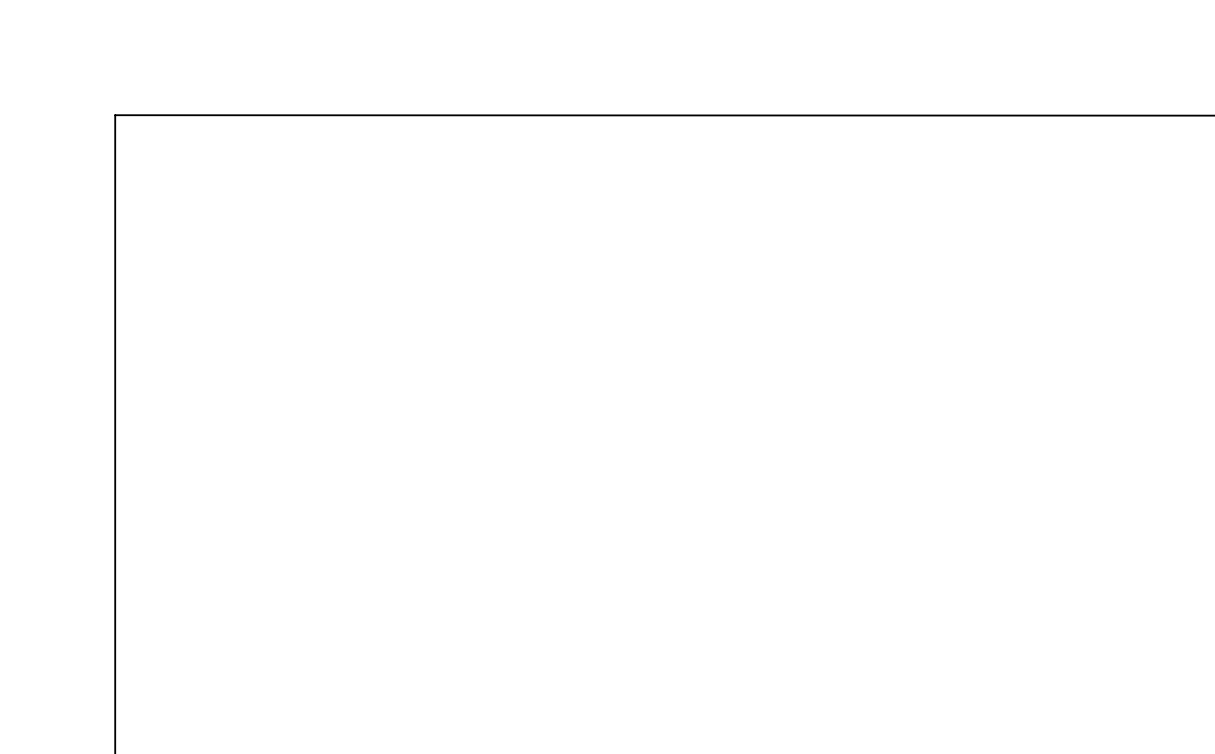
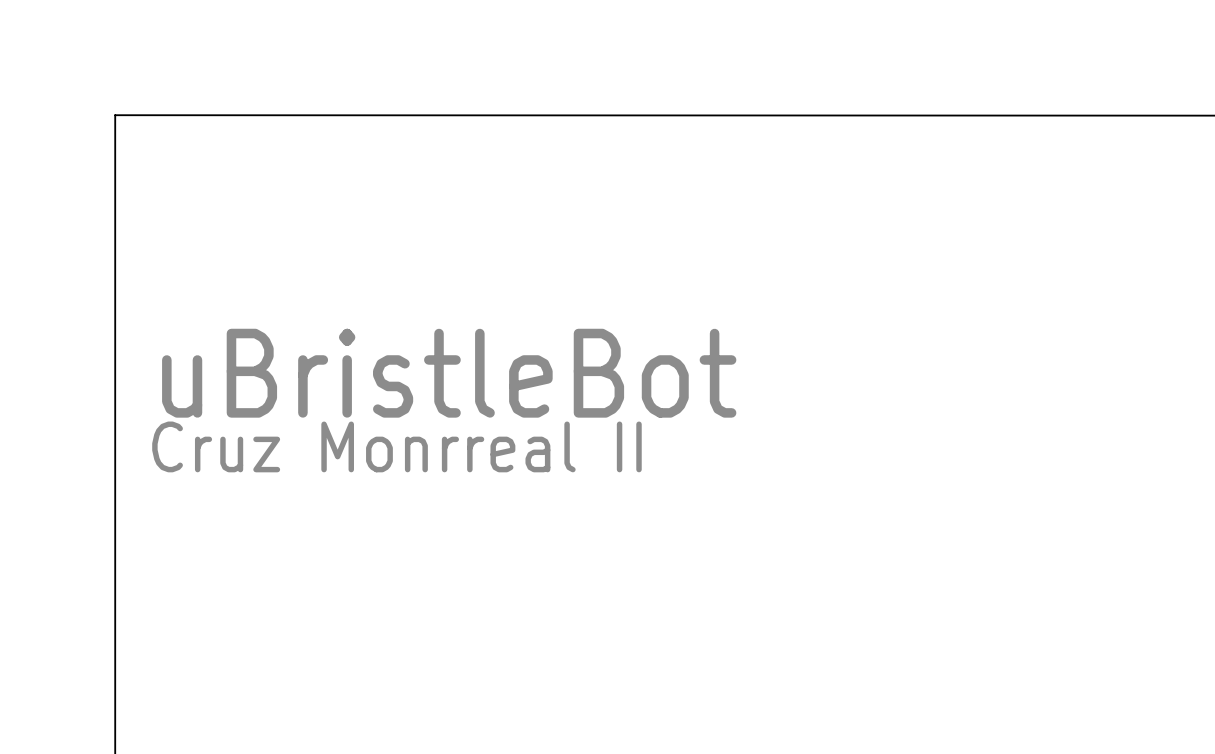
text: none -> uBristleBot (449, 373)
text: none -> Cruz Monrreal II (396, 446)

